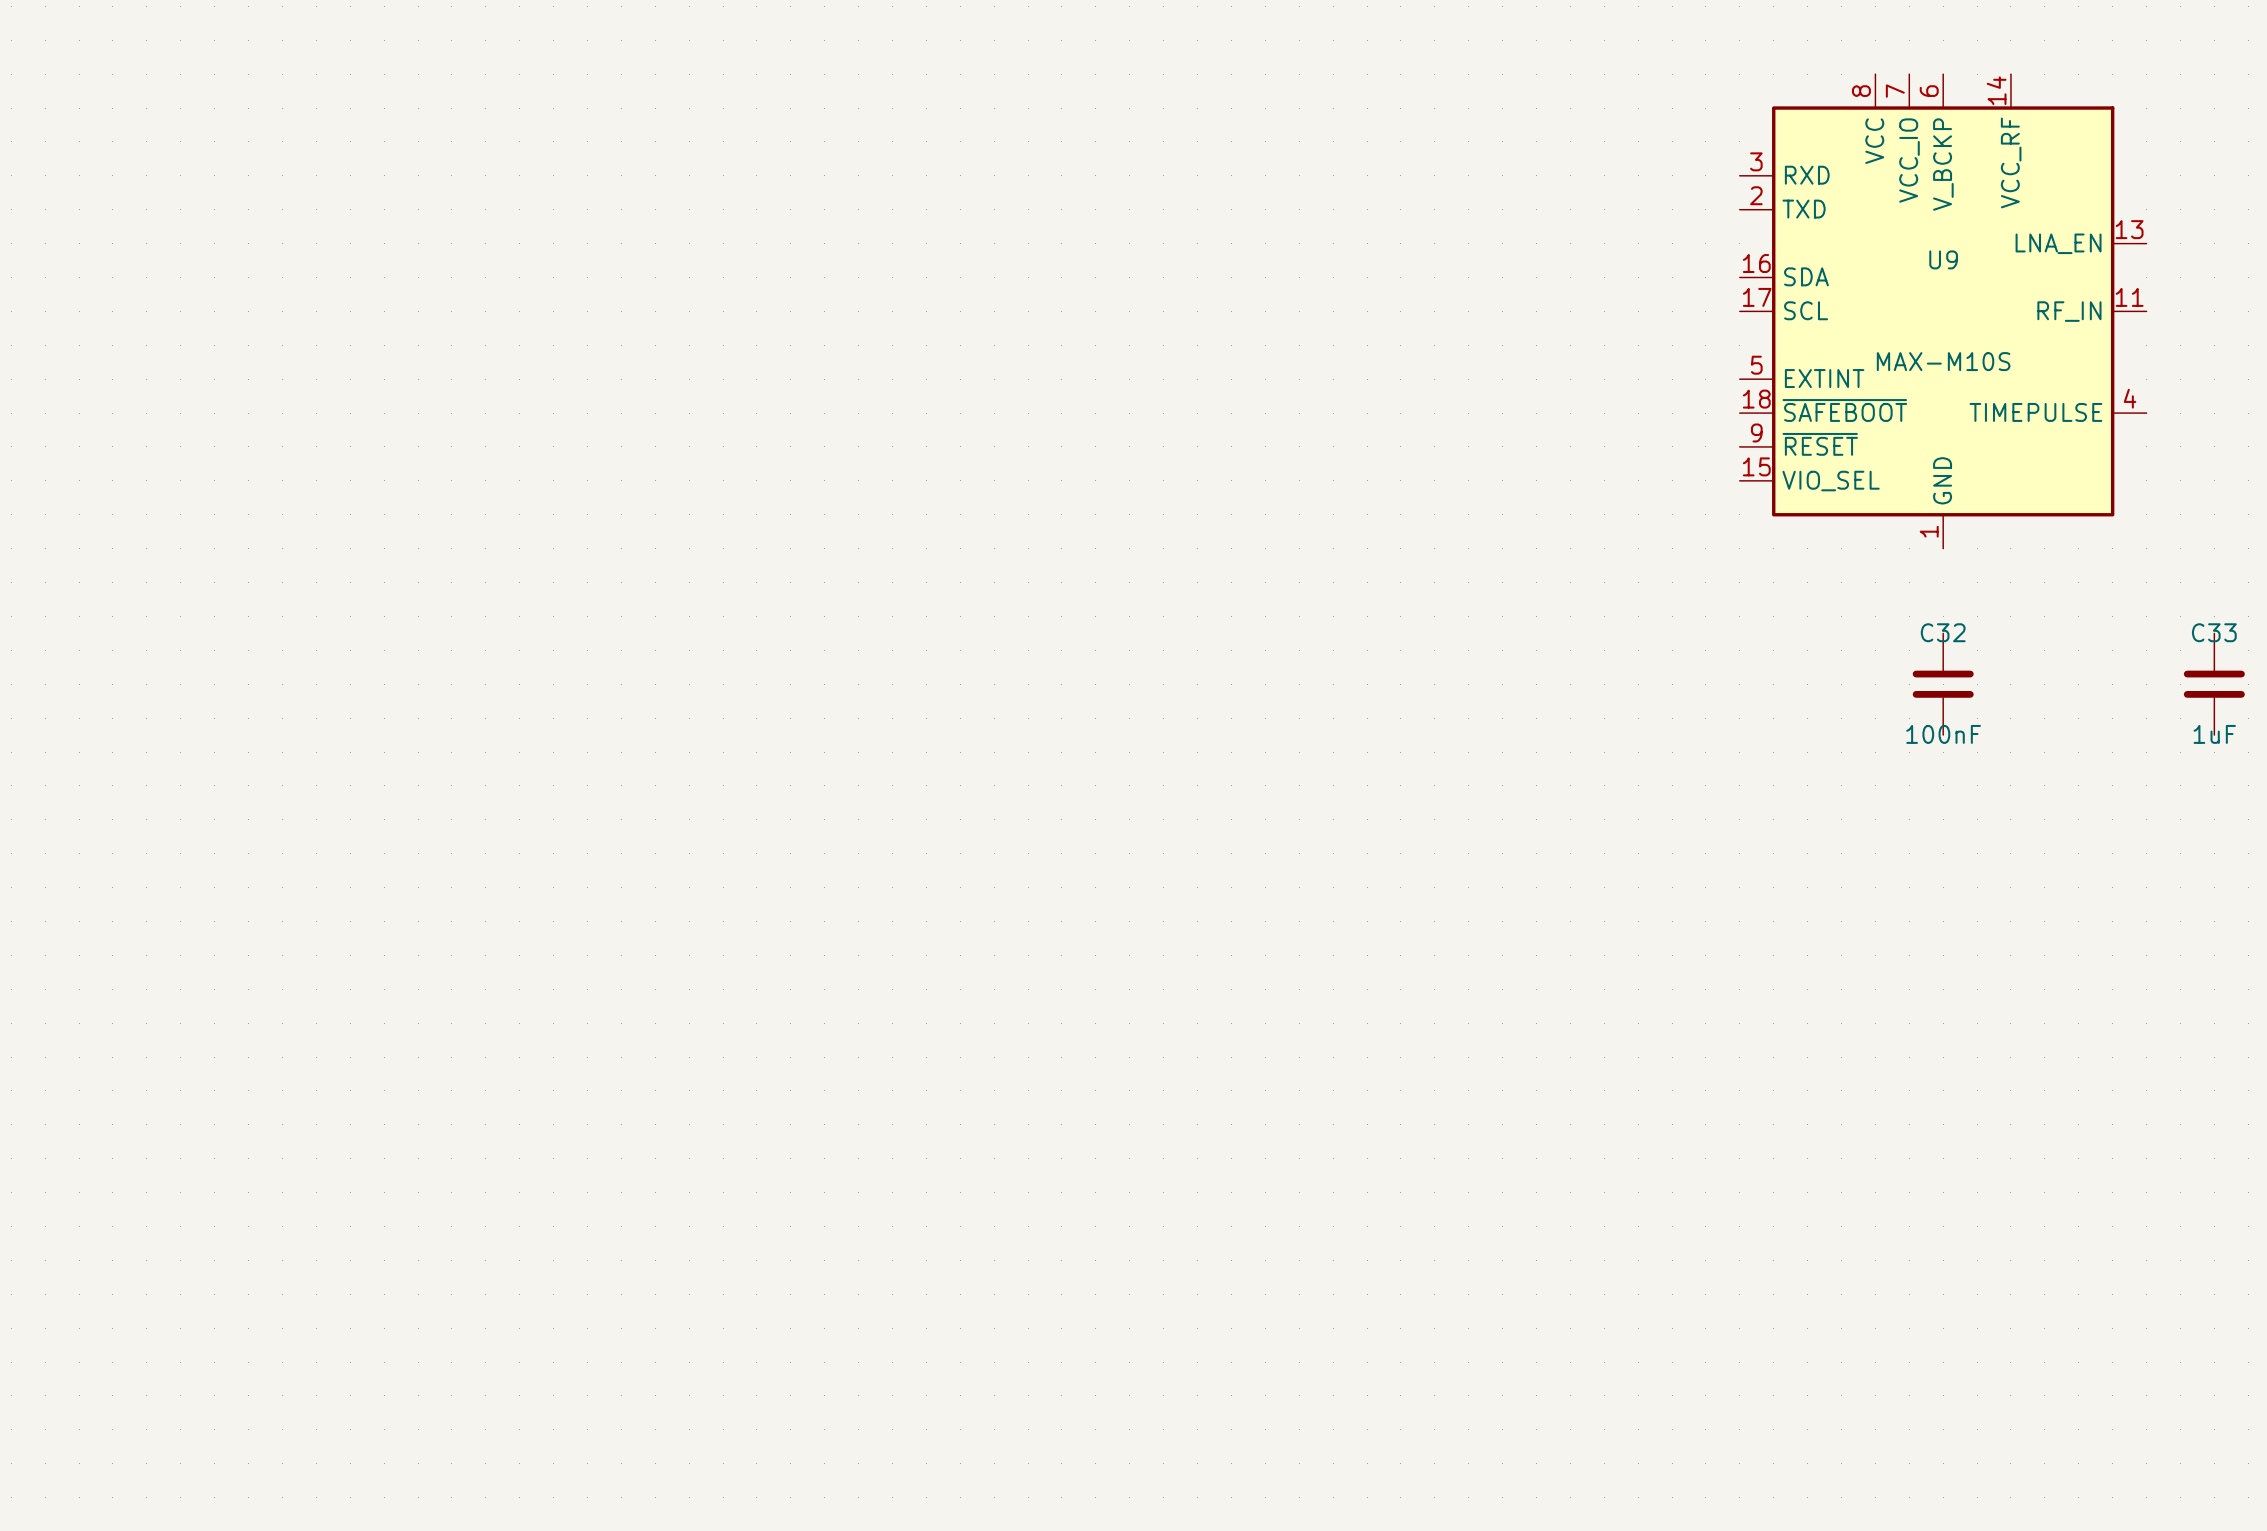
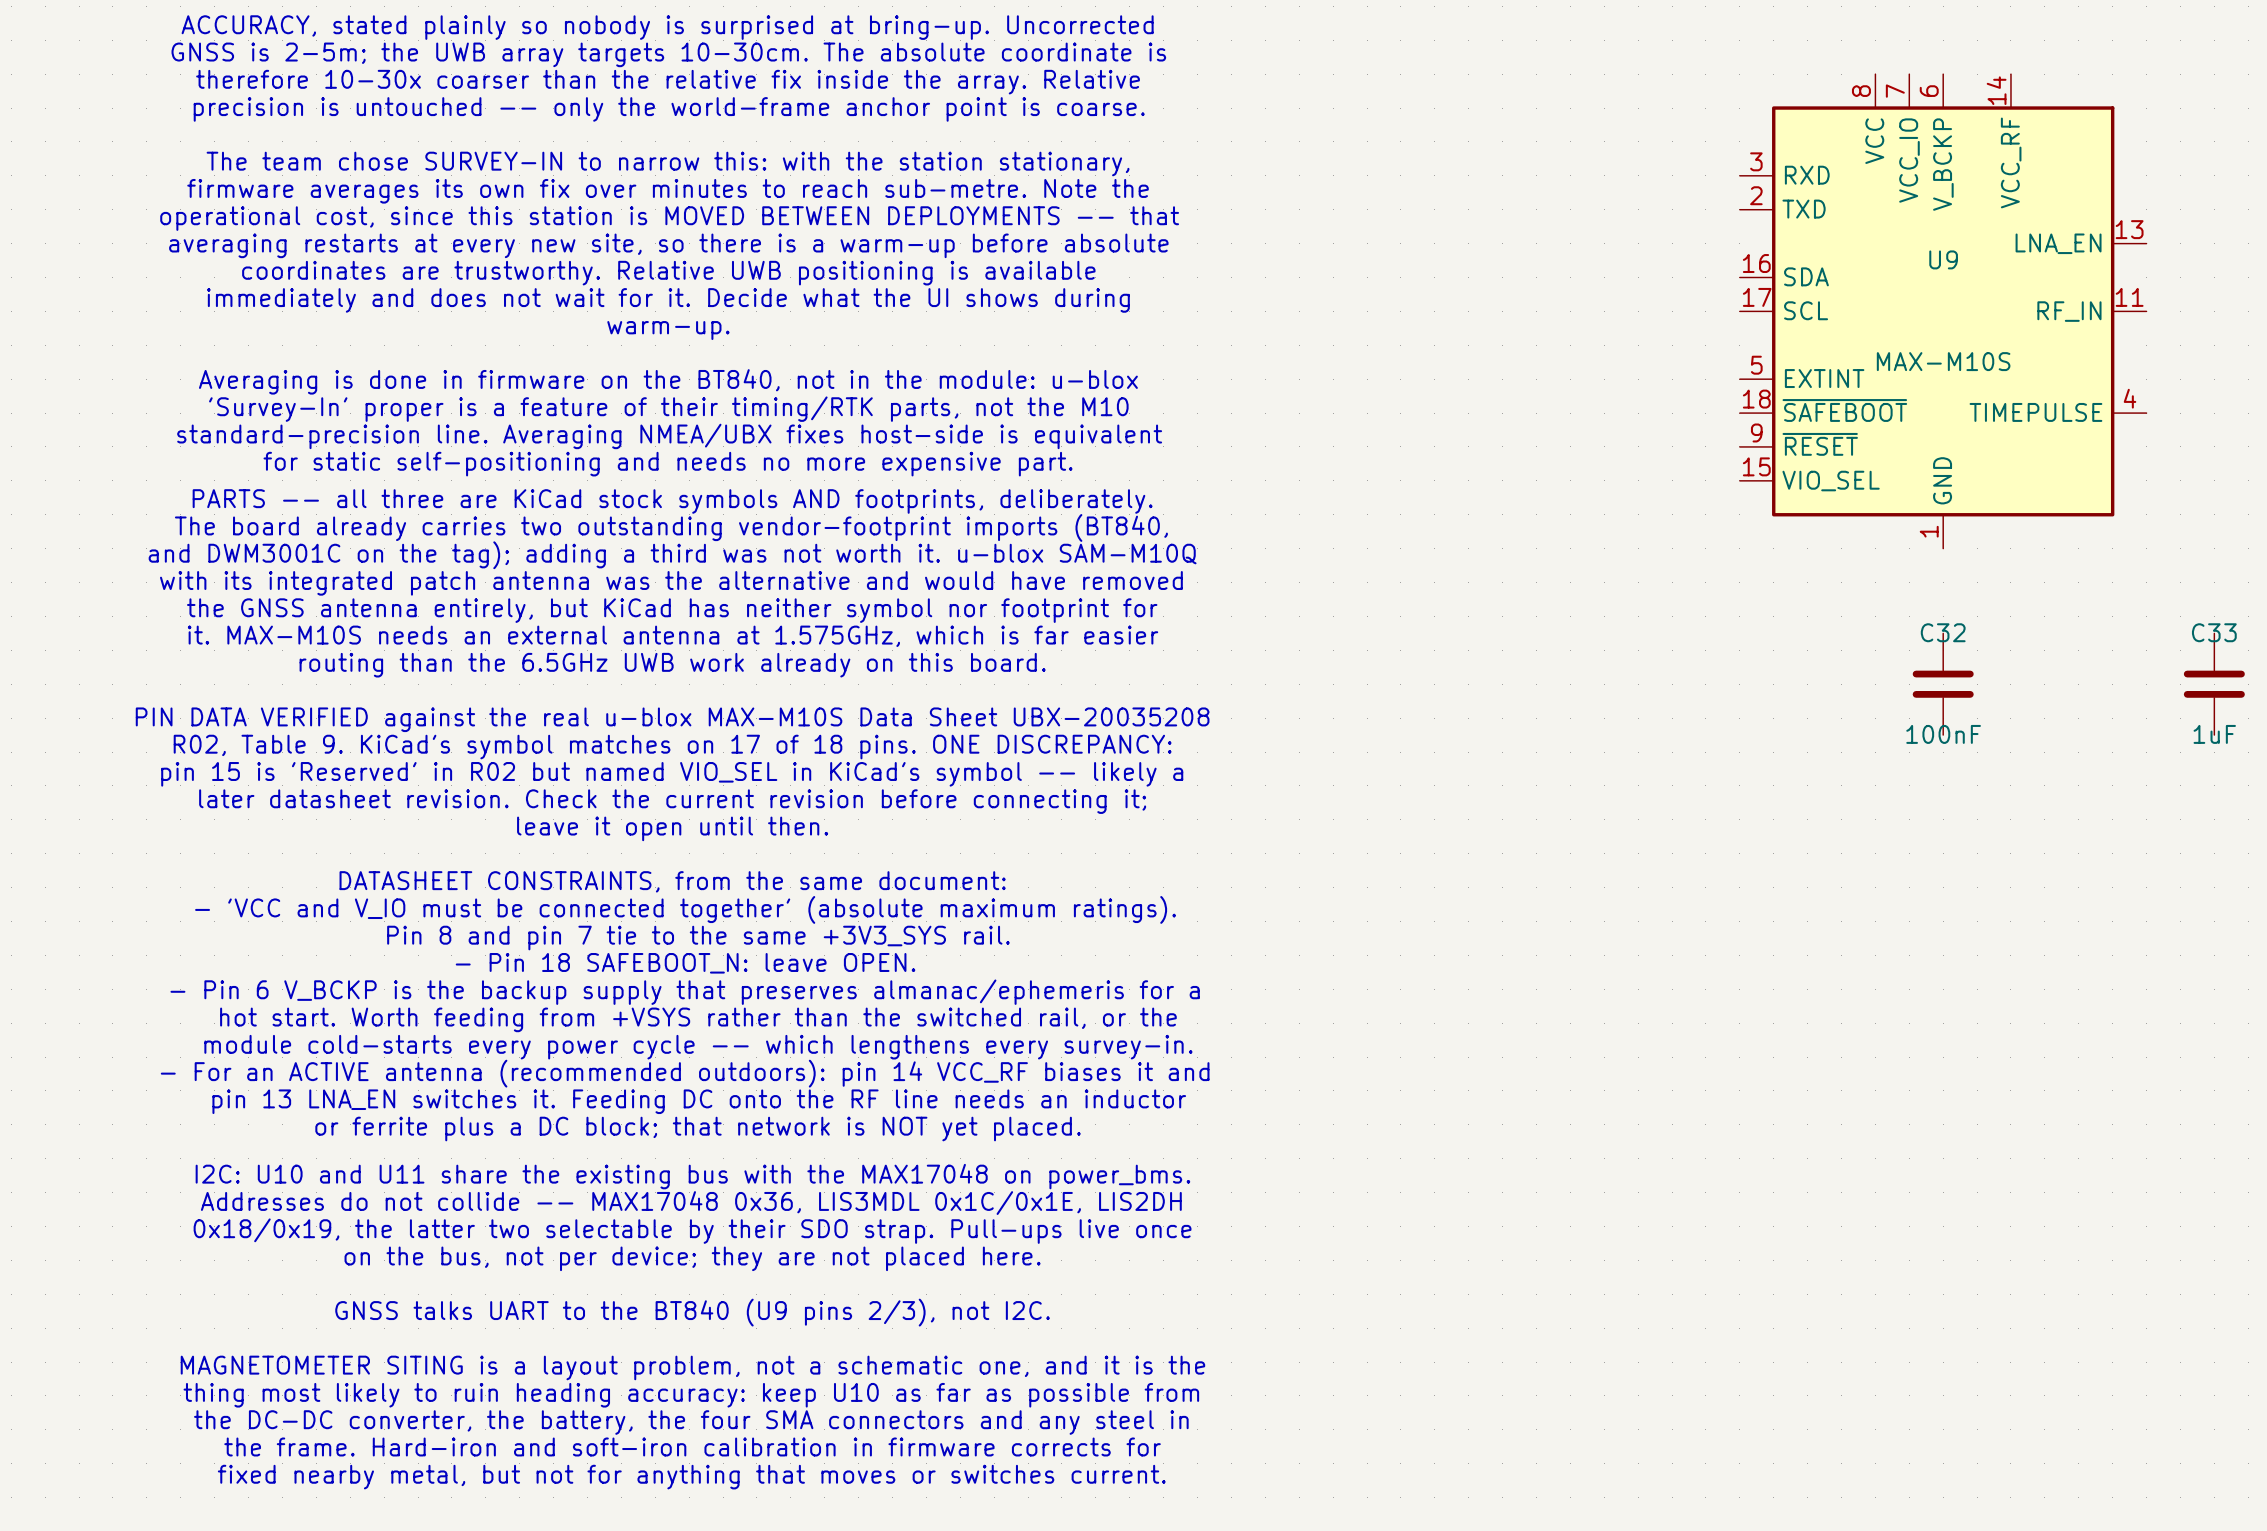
text: none -> ACCURACY, stated plainly so nobody is surprised at bring-up. Uncorrected (667, 27)
text: none -> GNSS is 2-5m; the UWB array targets 10-30cm. The absolute coordinate is (668, 54)
text: none -> therefore 10-30x coarser than the relative fix inside the array. Relative (668, 82)
text: none -> precision is untouched -- only the world-frame anchor point is coarse. (669, 109)
text: none -> The team chose SURVEY-IN to narrow this: with the station stationary, (668, 164)
text: none -> firmware averages its own fix over minutes to reach sub-metre. Note the (668, 191)
text: none -> operational cost, since this station is MOVED BETWEEN DEPLOYMENTS -- that (669, 218)
text: none -> averaging restarts at every new site, so there is a warm-up before absolute (668, 245)
text: none -> coordinates are trustworthy. Relative UWB positioning is available (668, 273)
text: none -> immediately and does not wait for it. Decide what the UI shows during (668, 300)
text: none -> warm-up. (668, 330)
text: none -> Averaging is done in firmware on the BT840, not in the module: u-blox (668, 381)
text: none -> 'Survey-In' proper is a feature of their timing/RTK parts, not the M10 (668, 409)
text: none -> standard-precision line. Averaging NMEA/UBX fixes host-side is equivalent (669, 436)
text: none -> for static self-positioning and needs no more expensive part. (668, 464)
text: none -> PARTS -- all three are KiCad stock symbols AND footprints, deliberately. (672, 501)
text: none -> The board already carries two outstanding vendor-footprint imports (BT840, (671, 527)
text: none -> and DWM3001C on the tag); adding a third was not worth it. u-blox SAM-M10Q (672, 555)
text: none -> with its integrated patch antenna was the alternative and would have removed (671, 583)
text: none -> the GNSS antenna entirely, but KiCad has neither symbol nor footprint for (672, 610)
text: none -> it. MAX-M10S needs an external antenna at 1.575GHz, which is far easier (673, 636)
text: none -> routing than the 6.5GHz UWB work already on this board. (672, 665)
text: none -> PIN DATA VERIFIED against the real u-blox MAX-M10S Data Sheet UBX-20035208 (672, 719)
text: none -> R02, Table 9. KiCad's symbol matches on 17 of 18 pins. ONE DISCREPANCY: (672, 747)
text: none -> pin 15 is 'Reserved' in R02 but named VIO_SEL in KiCad's symbol -- likely a (672, 774)
text: none -> later datasheet revision. Check the current revision before connecting it; (672, 801)
text: none -> leave it open until then. (672, 828)
text: none -> DATASHEET CONSTRAINTS, from the same document: (672, 881)
text: none -> - 'VCC and V_IO must be connected together' (absolute maximum ratings). (685, 909)
text: none -> Pin 8 and pin 7 tie to the same +3V3_SYS rail. (698, 938)
text: none -> - Pin 18 SAFEBOOT_N: leave OPEN. (685, 963)
text: none -> - Pin 6 V_BCKP is the backup supply that preserves almanac/ephemeris for a (685, 992)
text: none -> hot start. Worth feeding from +VSYS rather than the switched rail, or the (698, 1019)
text: none -> module cold-starts every power cycle -- which lengthens every survey-in. (698, 1047)
text: none -> - For an ACTIVE antenna (recommended outdoors): pin 14 VCC_RF biases it and (685, 1073)
text: none -> pin 13 LNA_EN switches it. Feeding DC onto the RF line needs an inductor (699, 1101)
text: none -> or ferrite plus a DC block; that network is NOT yet placed. (698, 1129)
text: none -> I2C: U10 and U11 share the existing bus with the MAX17048 on power_bms. (692, 1176)
text: none -> Addresses do not collide -- MAX17048 0x36, LIS3MDL 0x1C/0x1E, LIS2DH (691, 1203)
text: none -> 0x18/0x19, the latter two selectable by their SDO strap. Pull-ups live once (692, 1231)
text: none -> on the bus, not per device; they are not placed here. (692, 1258)
text: none -> GNSS talks UART to the BT840 (U9 pins 2/3), not I2C. (692, 1312)
text: none -> MAGNETOMETER SITING is a layout problem, not a schematic one, and it is the (692, 1367)
text: none -> thing most likely to ruin heading accuracy: keep U10 as far as possible from (691, 1395)
text: none -> the DC-DC converter, the battery, the four SMA connectors and any steel in (691, 1422)
text: none -> the frame. Hard-iron and soft-iron calibration in firmware corrects for (692, 1446)
text: none -> fixed nearby metal, but not for anything that moves or switches current. (691, 1477)

